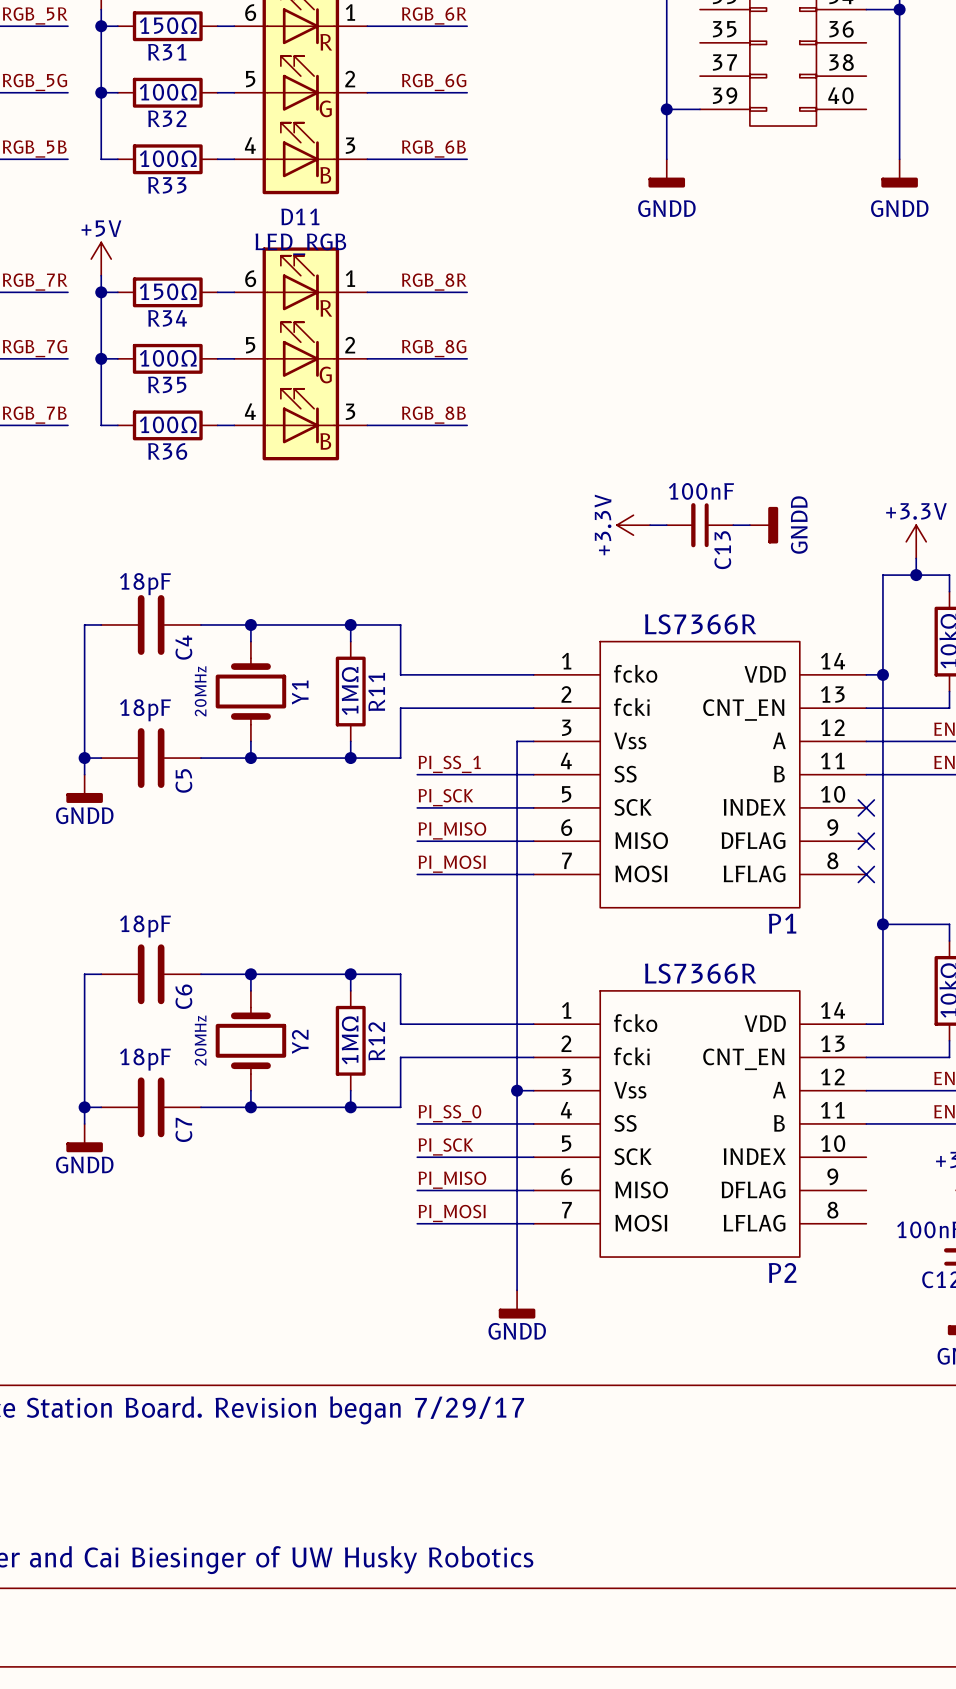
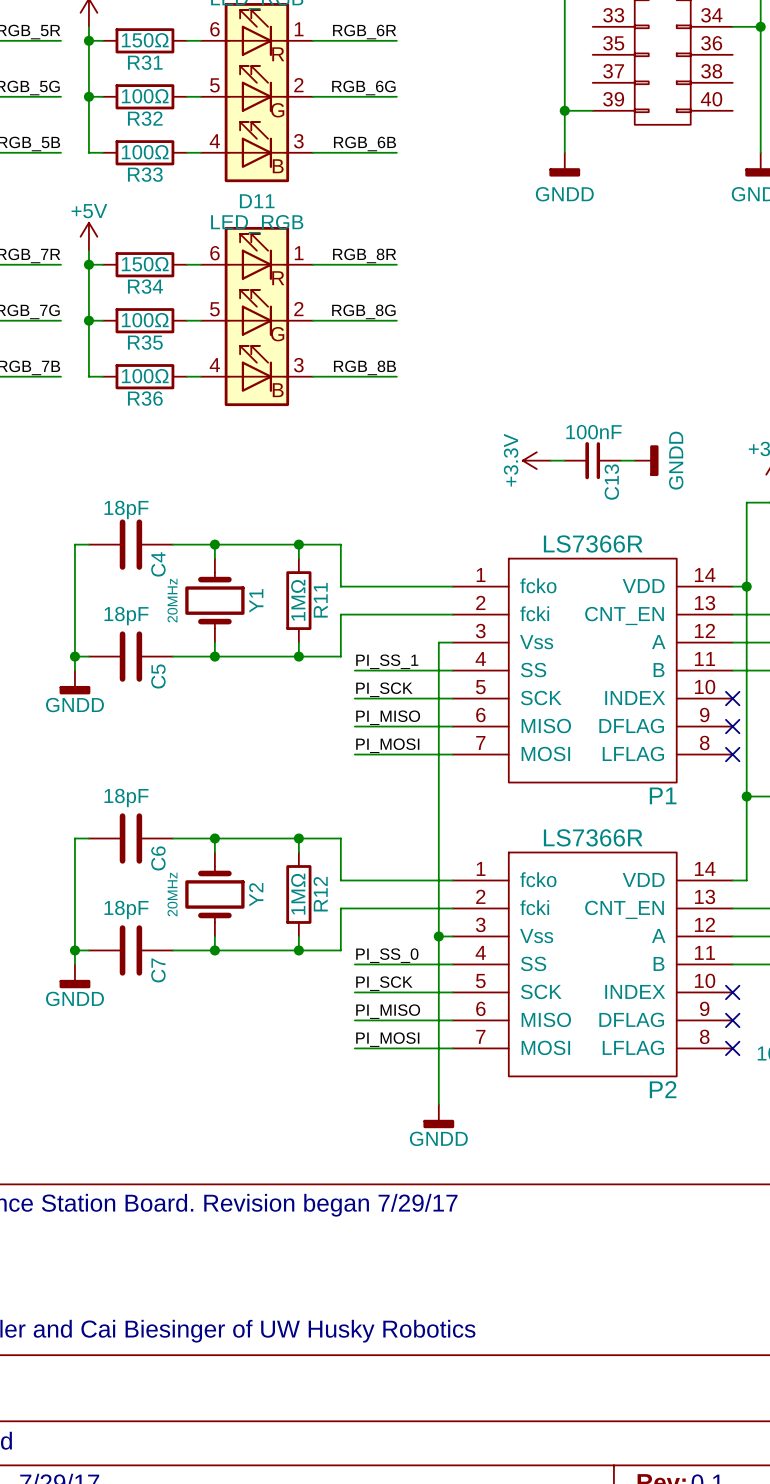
no-connect mark: none -> (732, 992)
no-connect mark: none -> (732, 1020)
no-connect mark: none -> (732, 1048)

